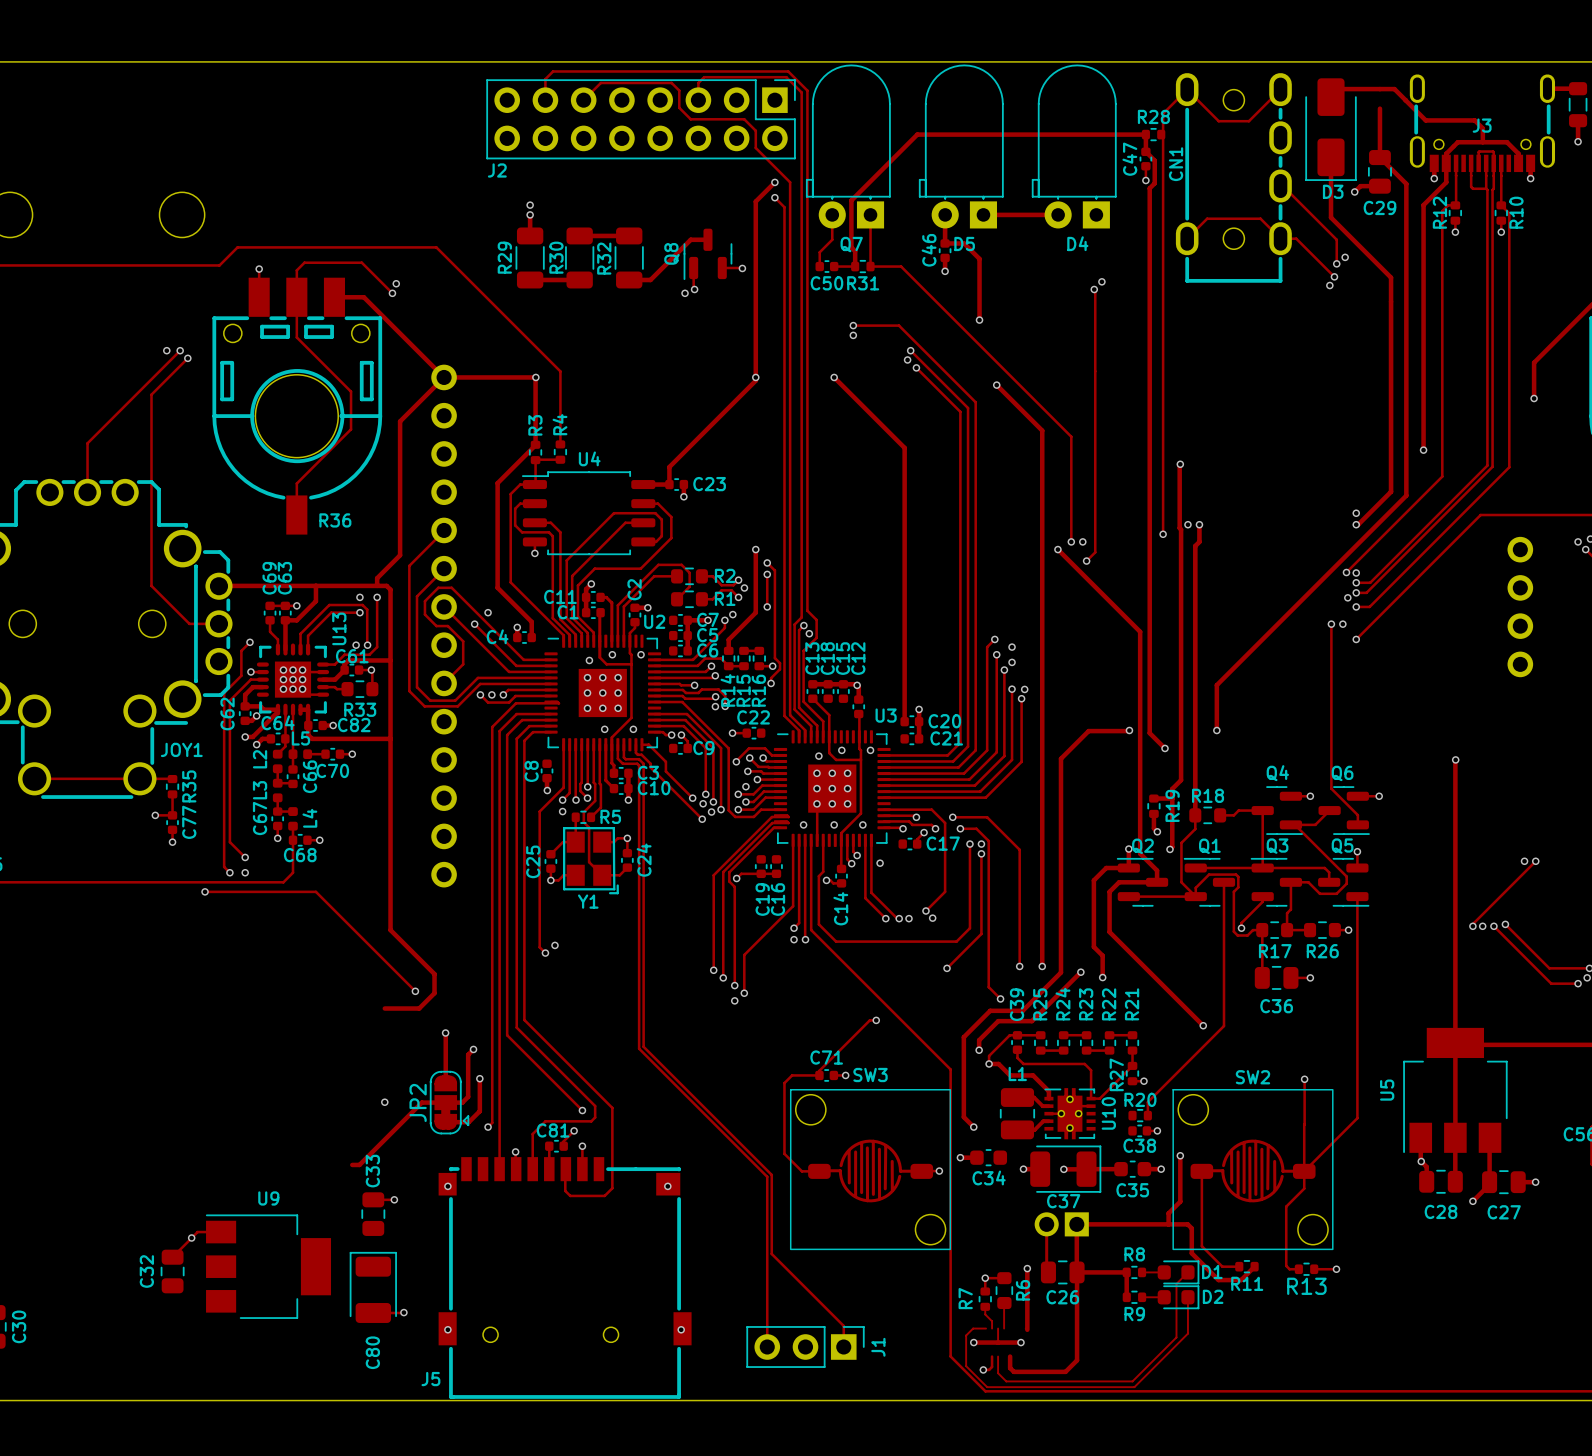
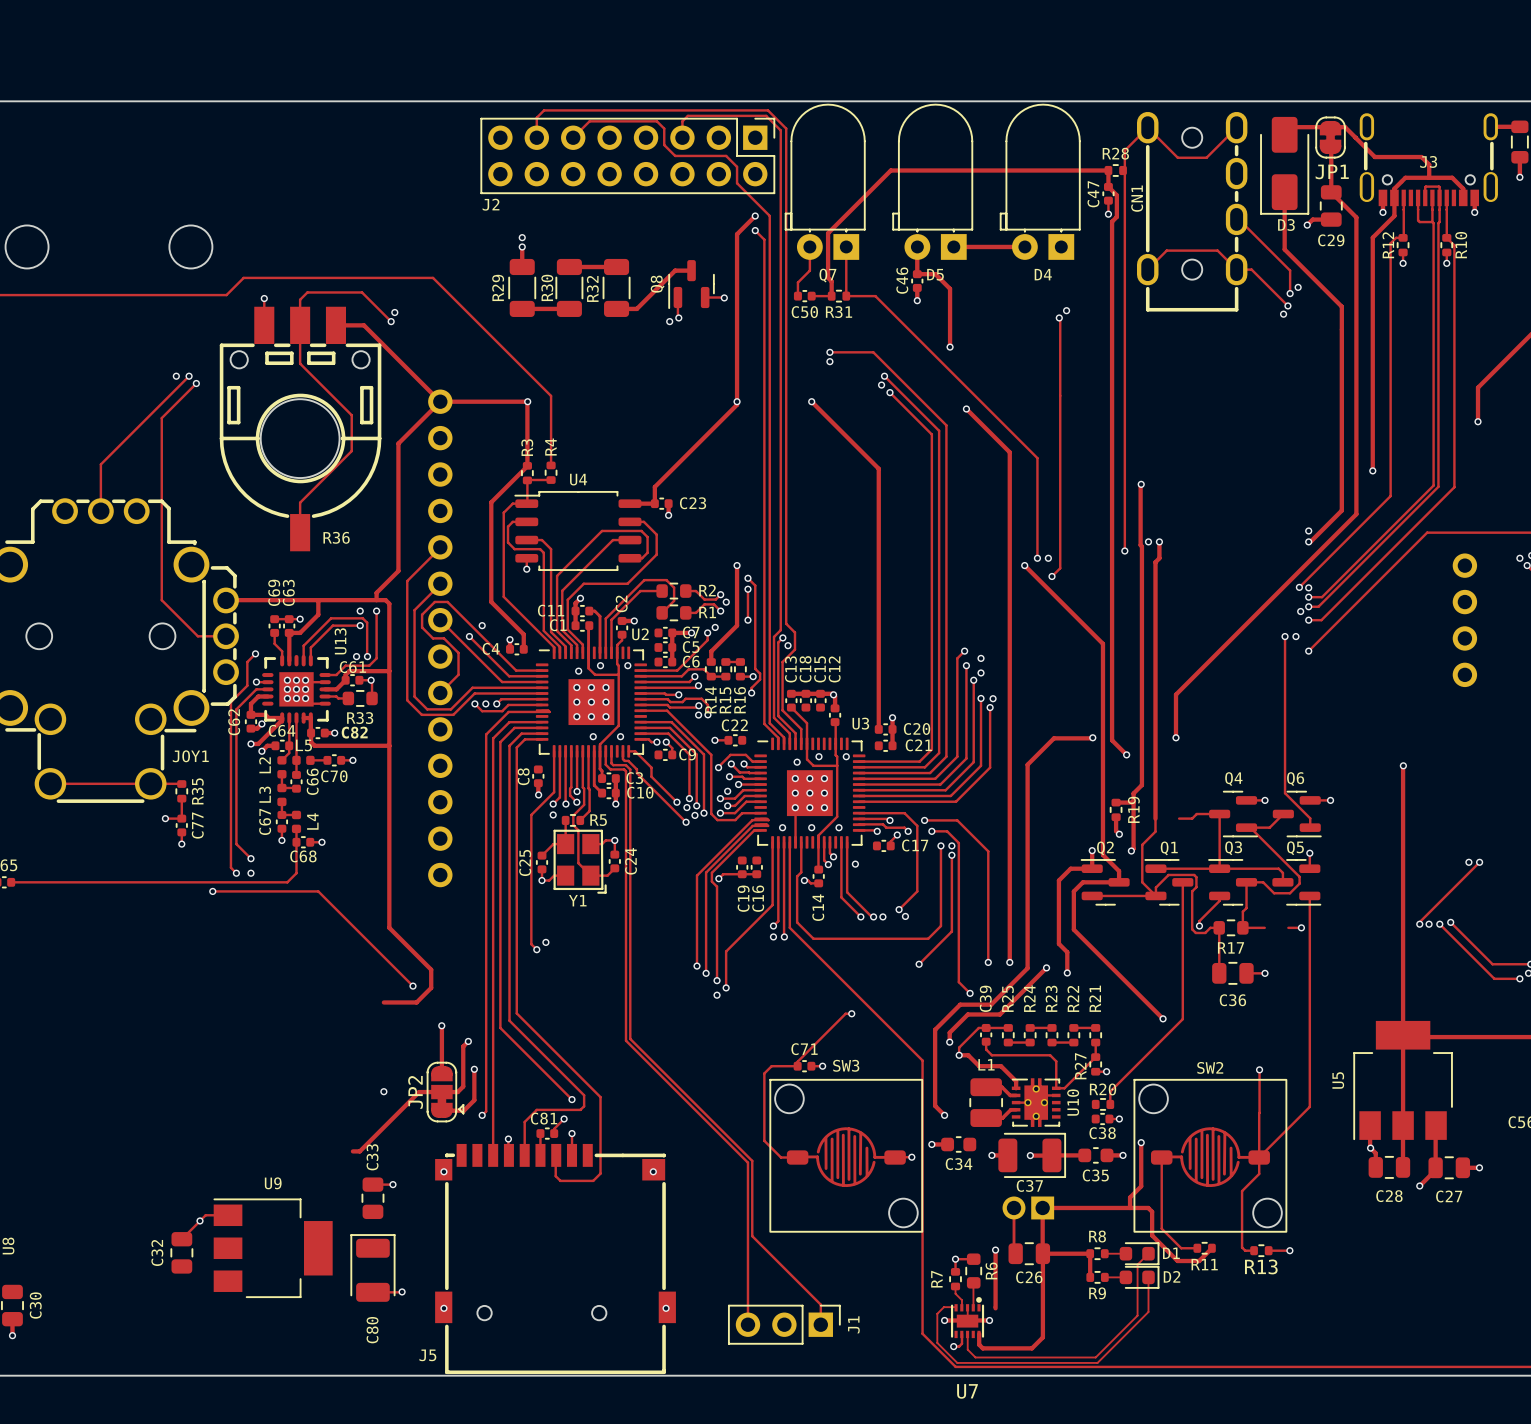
JP1: none -> (1330, 137)
R18: (1207, 815) -> none
R26: (1322, 930) -> none
U7: none -> (967, 1317)

